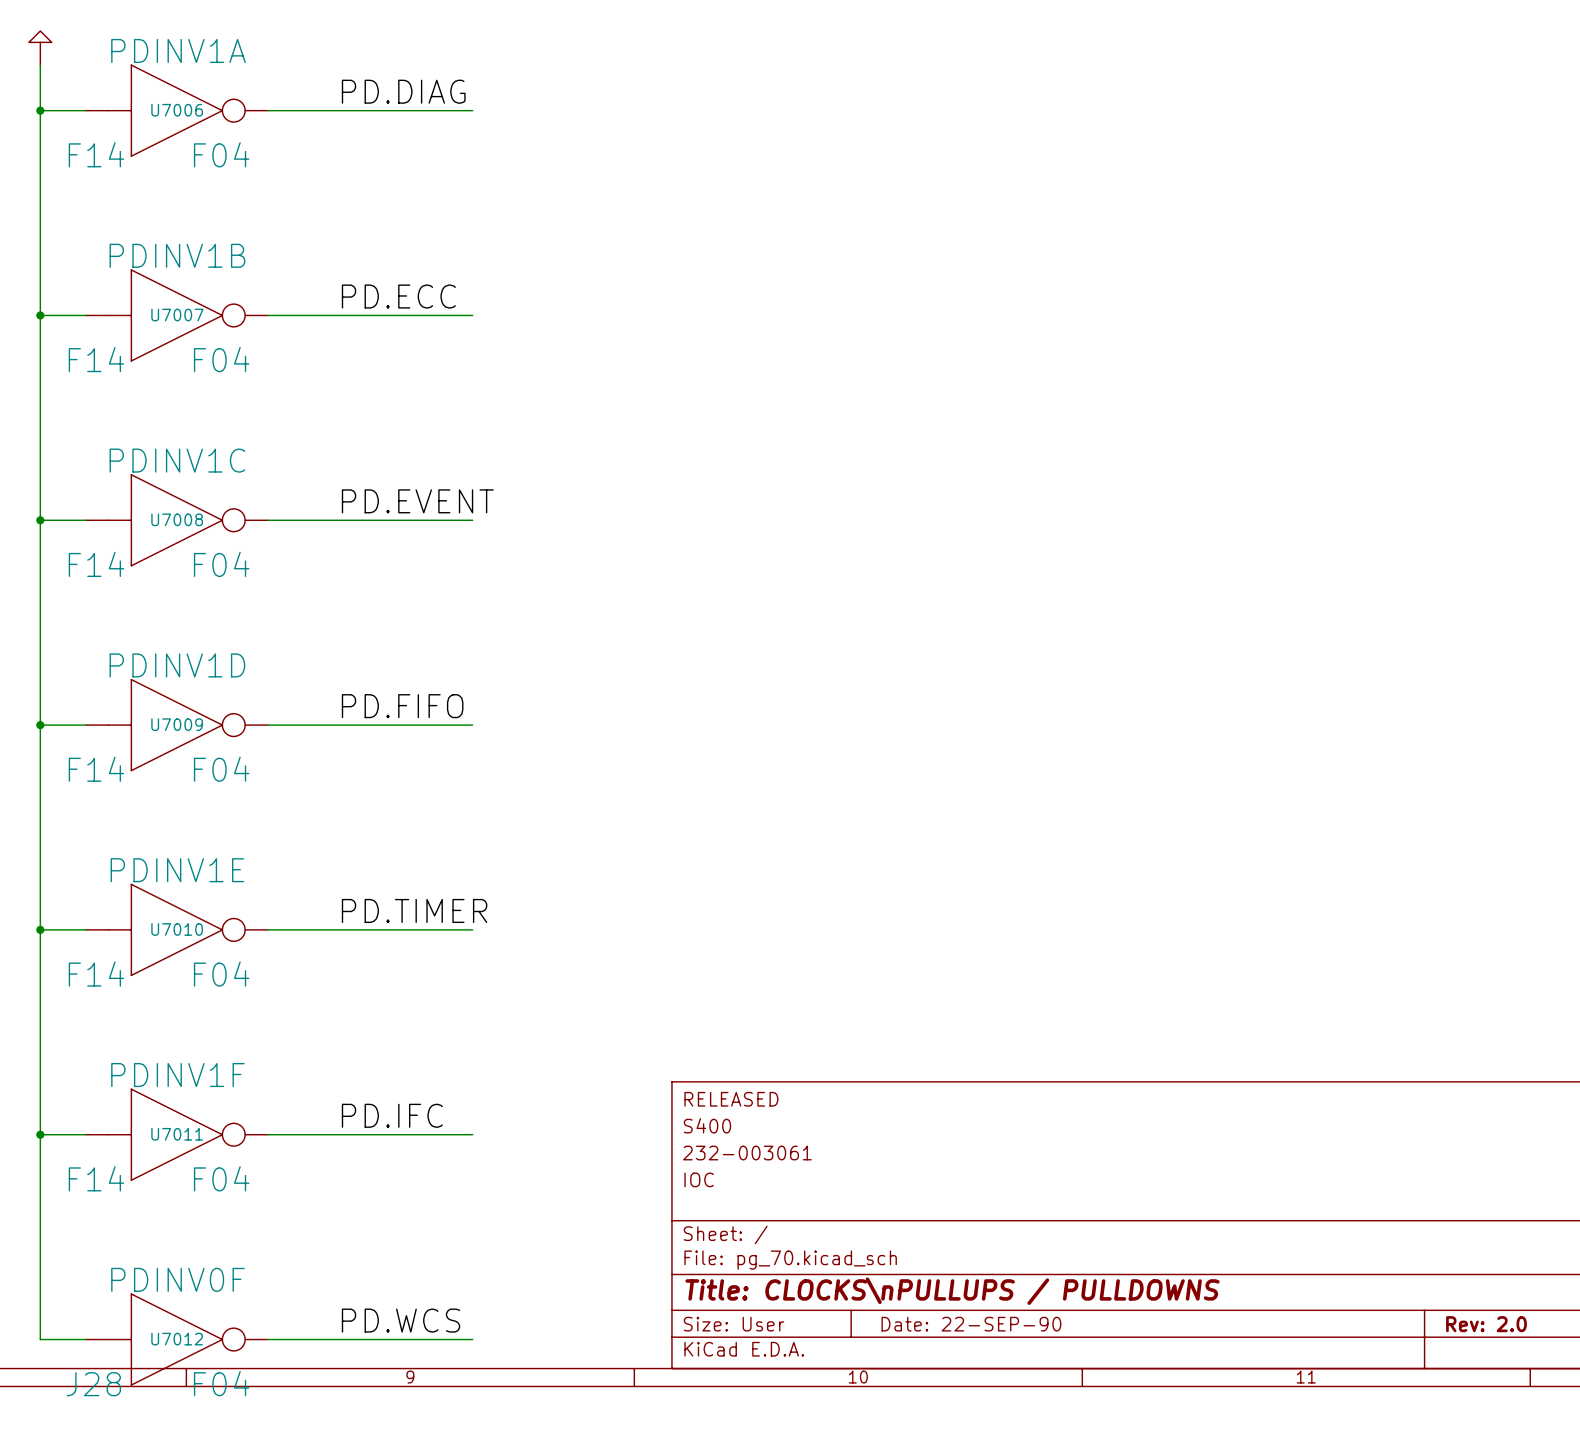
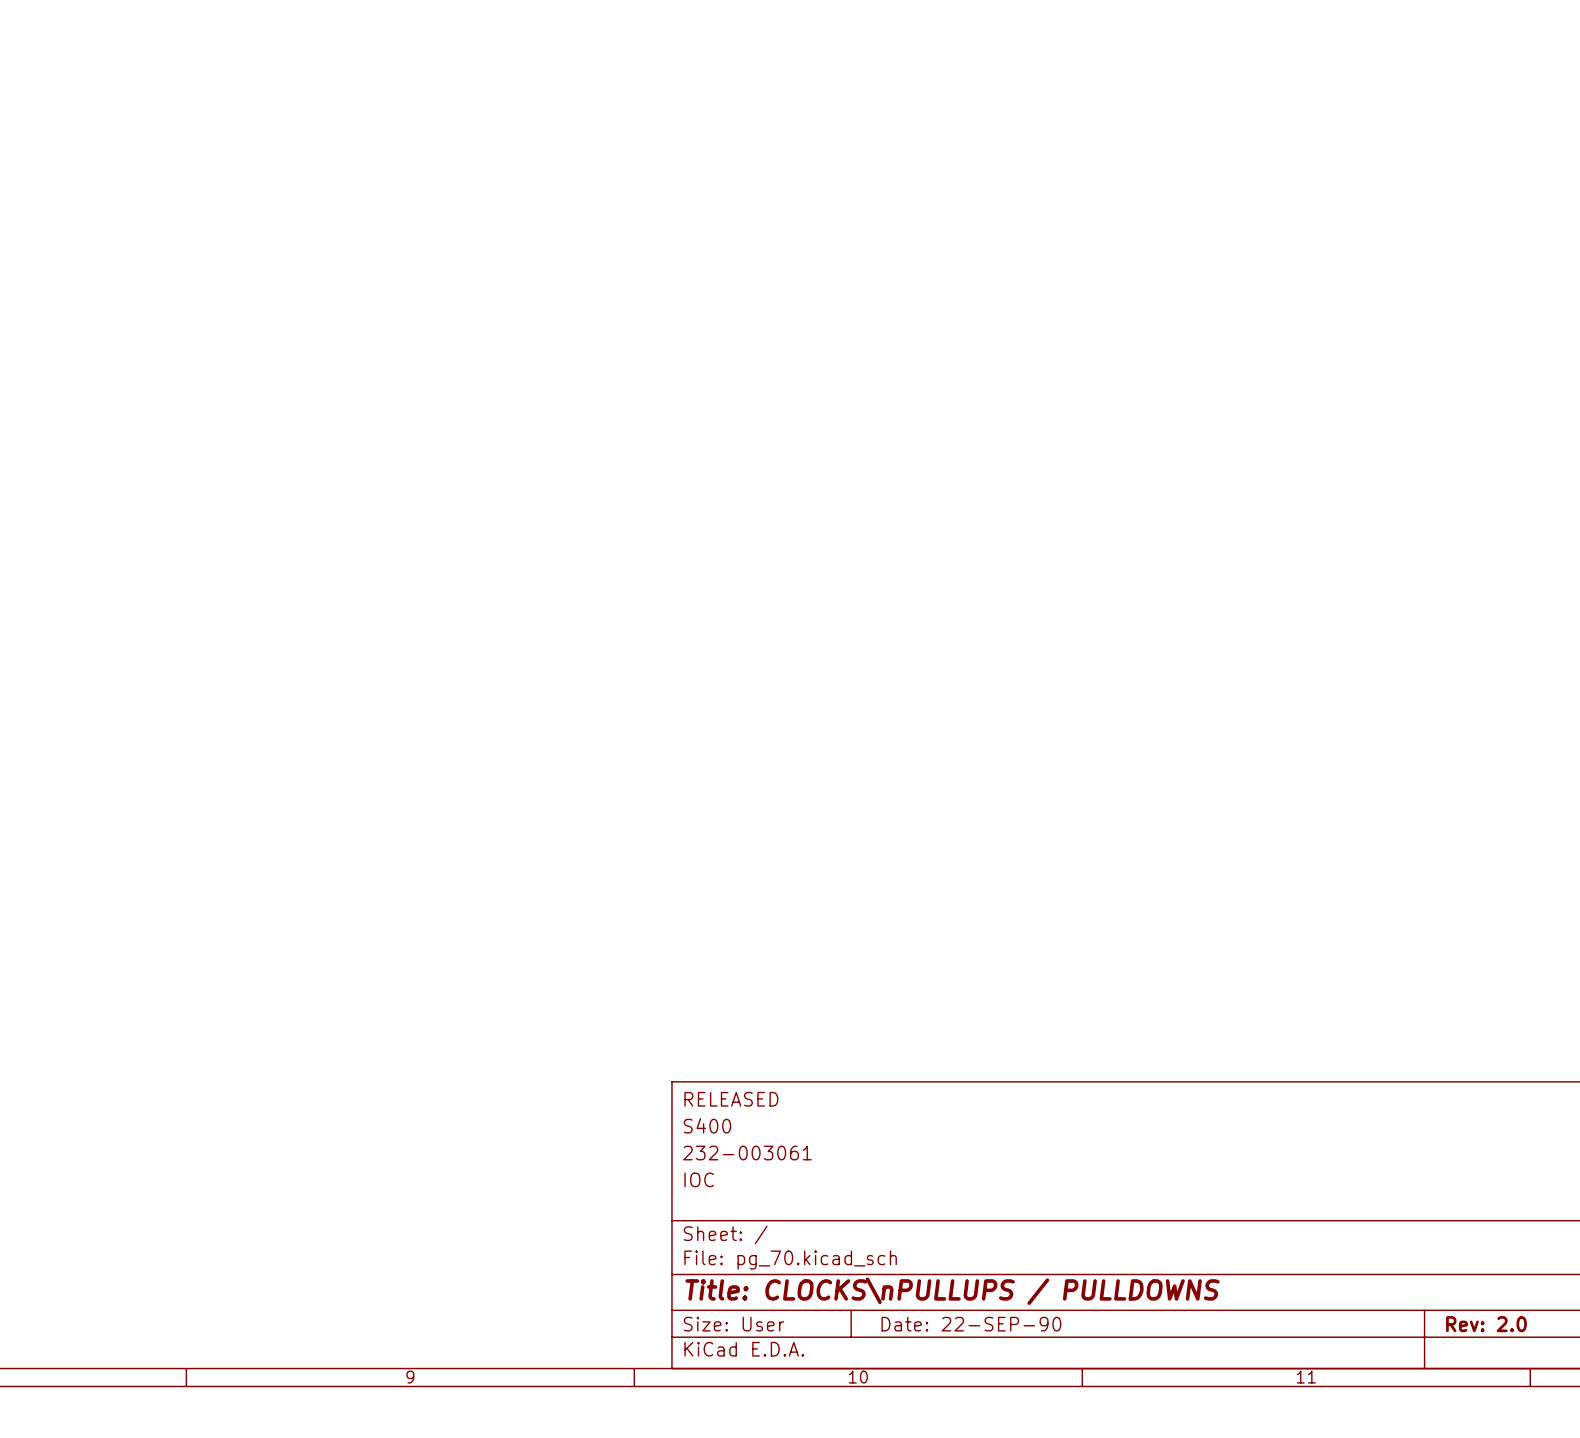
power symbol: (40, 47) -> none
wire: (40, 65) (40, 1339) (85, 1339) -> none
label: PD.DIAG (403, 91) -> none
wire: (40, 110) (85, 110) -> none
junction: (40, 110) -> none
U7006: F04 (176, 110) -> none
wire: (267, 110) (472, 110) -> none
label: PD.ECC (398, 296) -> none
wire: (40, 315) (85, 315) -> none
junction: (40, 315) -> none
U7007: F04 (176, 315) -> none
wire: (267, 315) (472, 315) -> none
label: PD.EVENT (417, 501) -> none
wire: (40, 520) (85, 520) -> none
junction: (40, 520) -> none
U7008: F04 (176, 520) -> none
wire: (267, 520) (472, 520) -> none
label: PD.FIFO (402, 706) -> none
wire: (40, 725) (85, 725) -> none
junction: (40, 725) -> none
U7009: F04 (176, 725) -> none
wire: (267, 725) (472, 725) -> none
label: PD.TIMER (414, 910) -> none
wire: (40, 929) (85, 929) -> none
junction: (40, 929) -> none
U7010: F04 (176, 929) -> none
wire: (267, 929) (472, 929) -> none
label: PD.IFC (392, 1115) -> none
wire: (40, 1134) (85, 1134) -> none
junction: (40, 1134) -> none
U7011: F04 (176, 1134) -> none
wire: (267, 1134) (472, 1134) -> none
label: PD.WCS (401, 1320) -> none
U7012: F04 (176, 1339) -> none
wire: (267, 1339) (472, 1339) -> none

